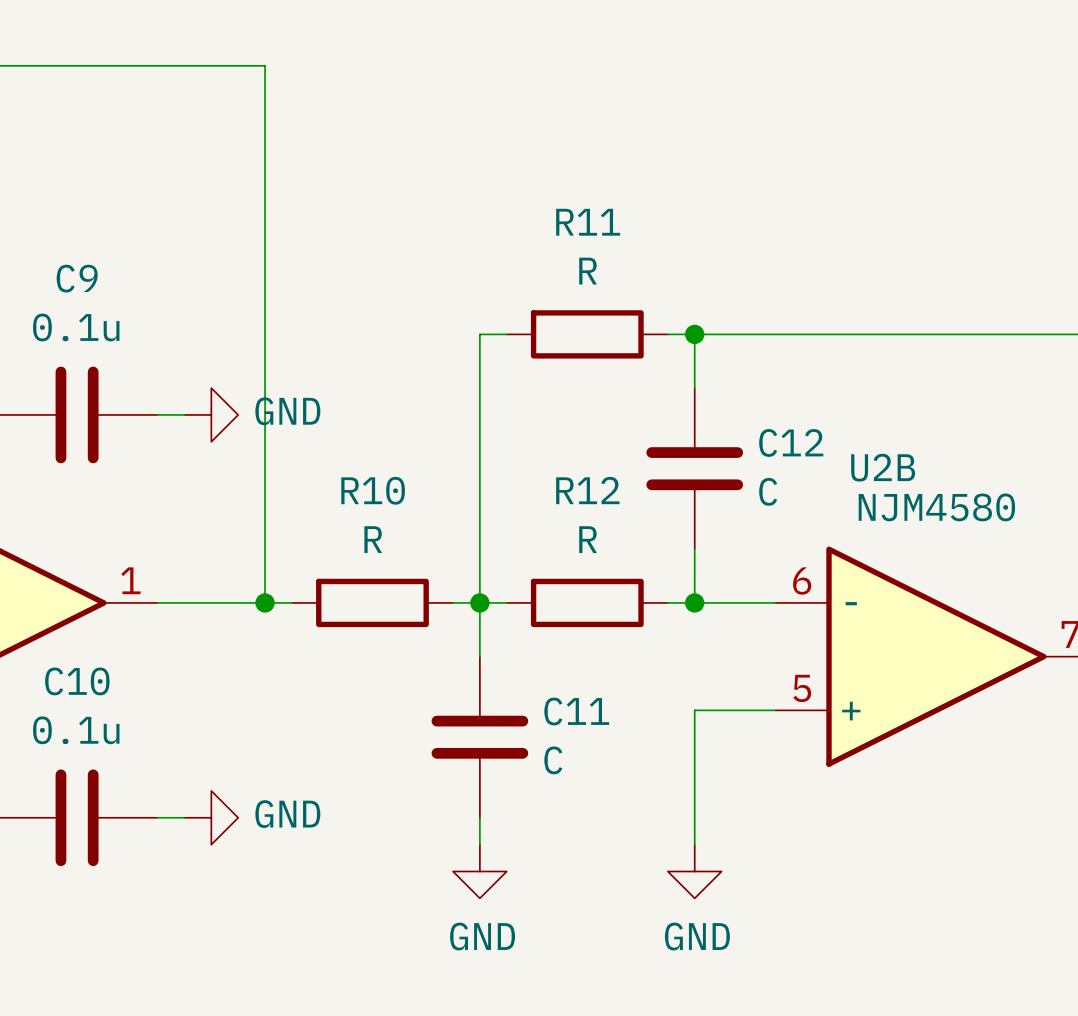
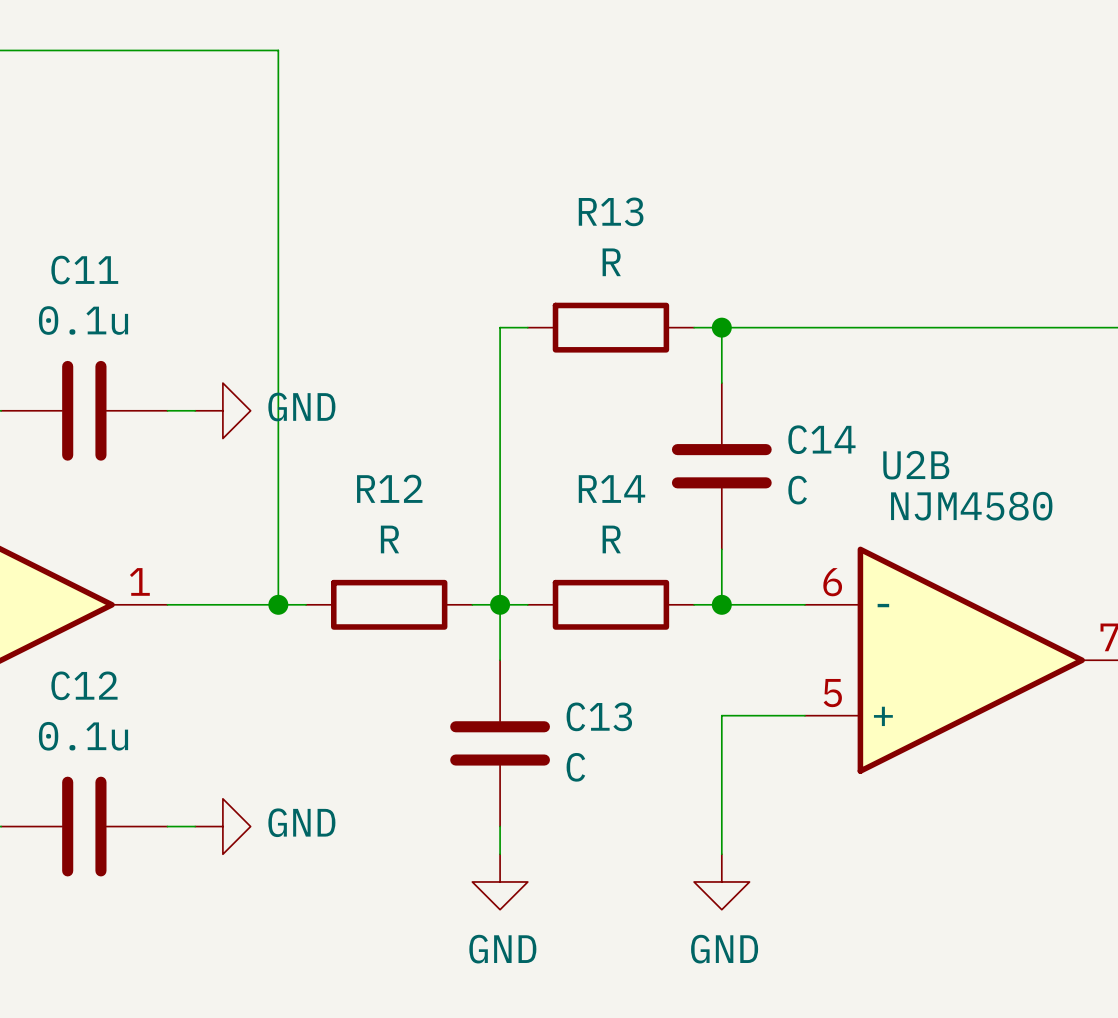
R11 name: R11 (588, 222) -> R13 (611, 211)
C9 name: C9 (77, 278) -> C11 (84, 270)
C12 name: C12 (791, 442) -> C14 (821, 439)
R10 name: R10 (373, 490) -> R12 (389, 488)
R12 name: R12 (587, 490) -> R14 (611, 489)
C10 name: C10 (77, 681) -> C12 (84, 685)
C11 name: C11 (576, 711) -> C13 (599, 716)

